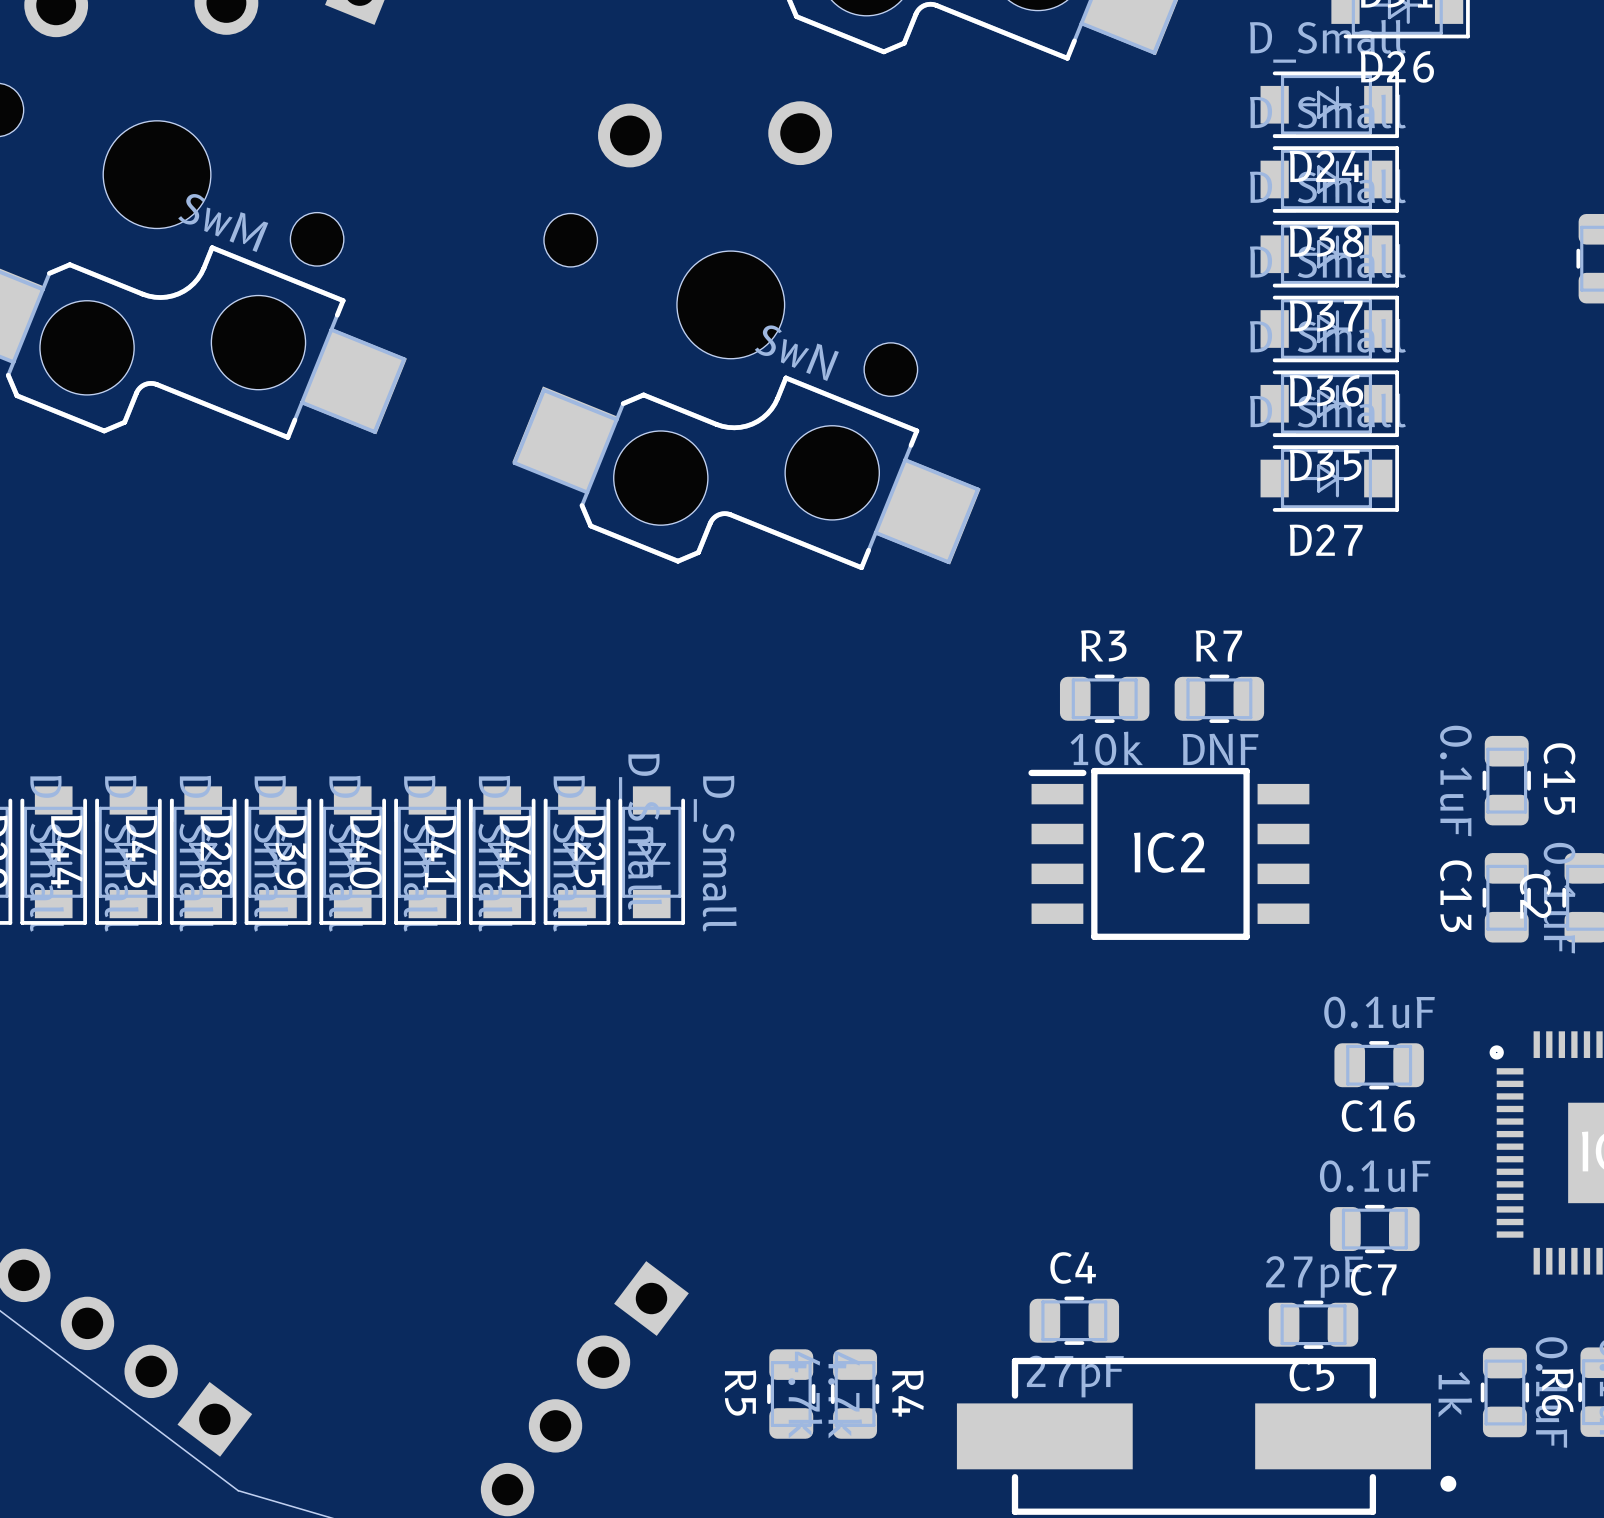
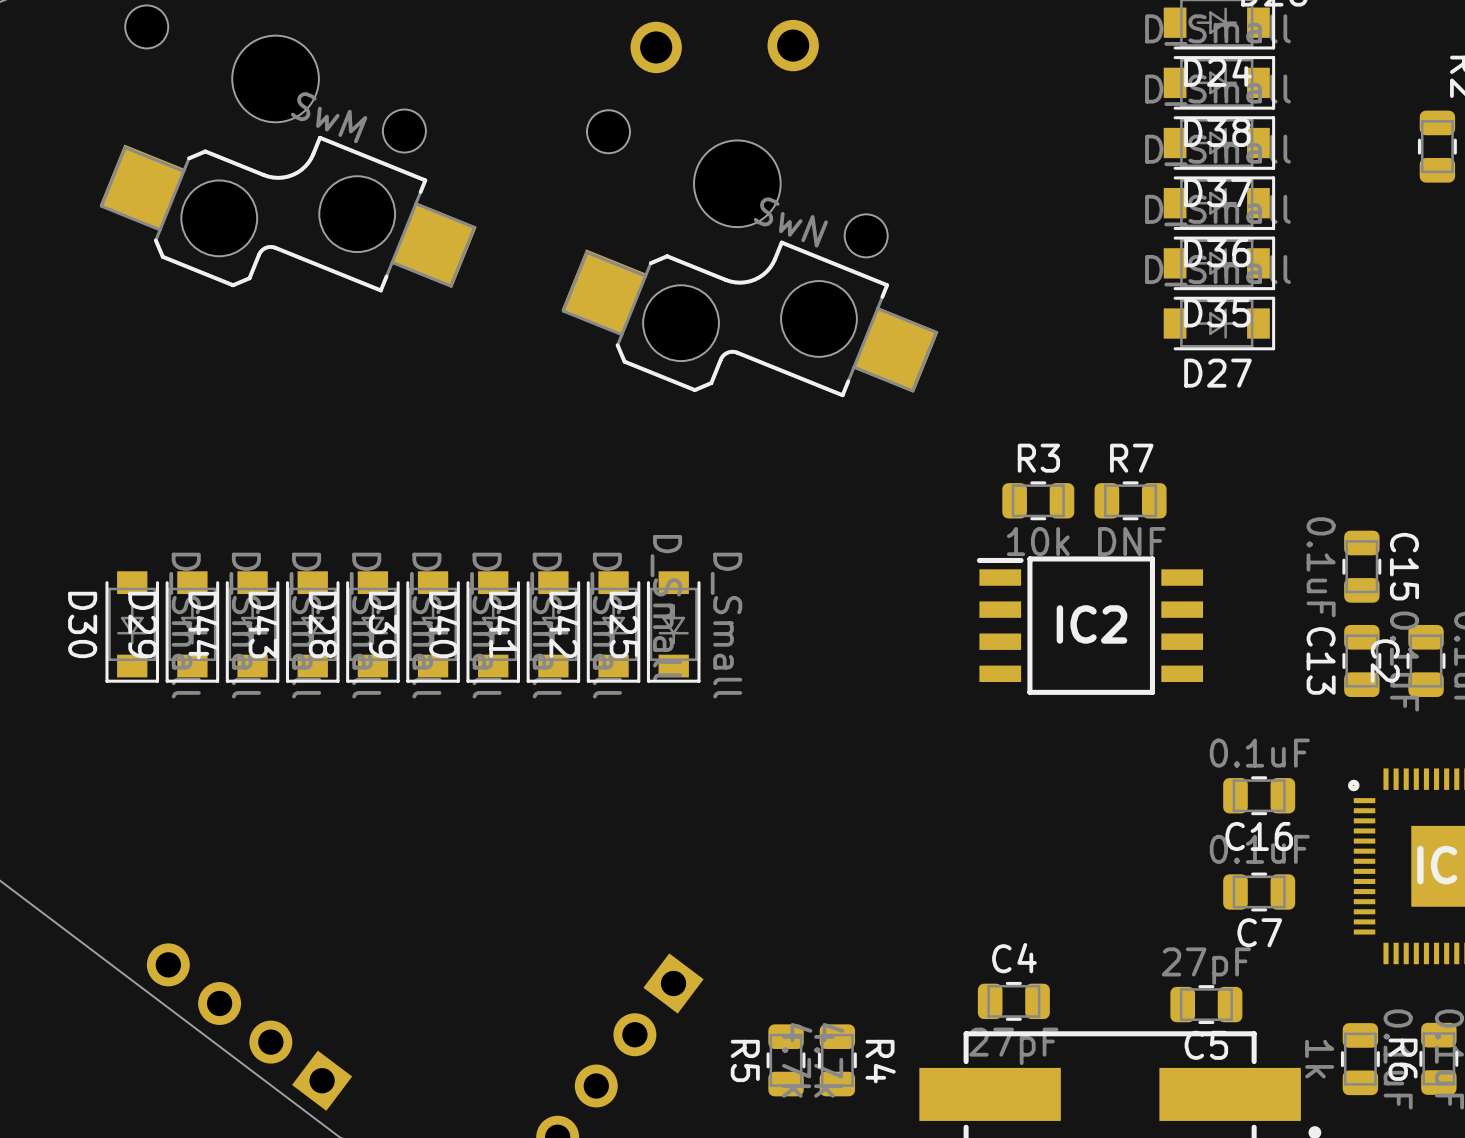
C7 position: (1374, 1229) -> (1259, 891)

